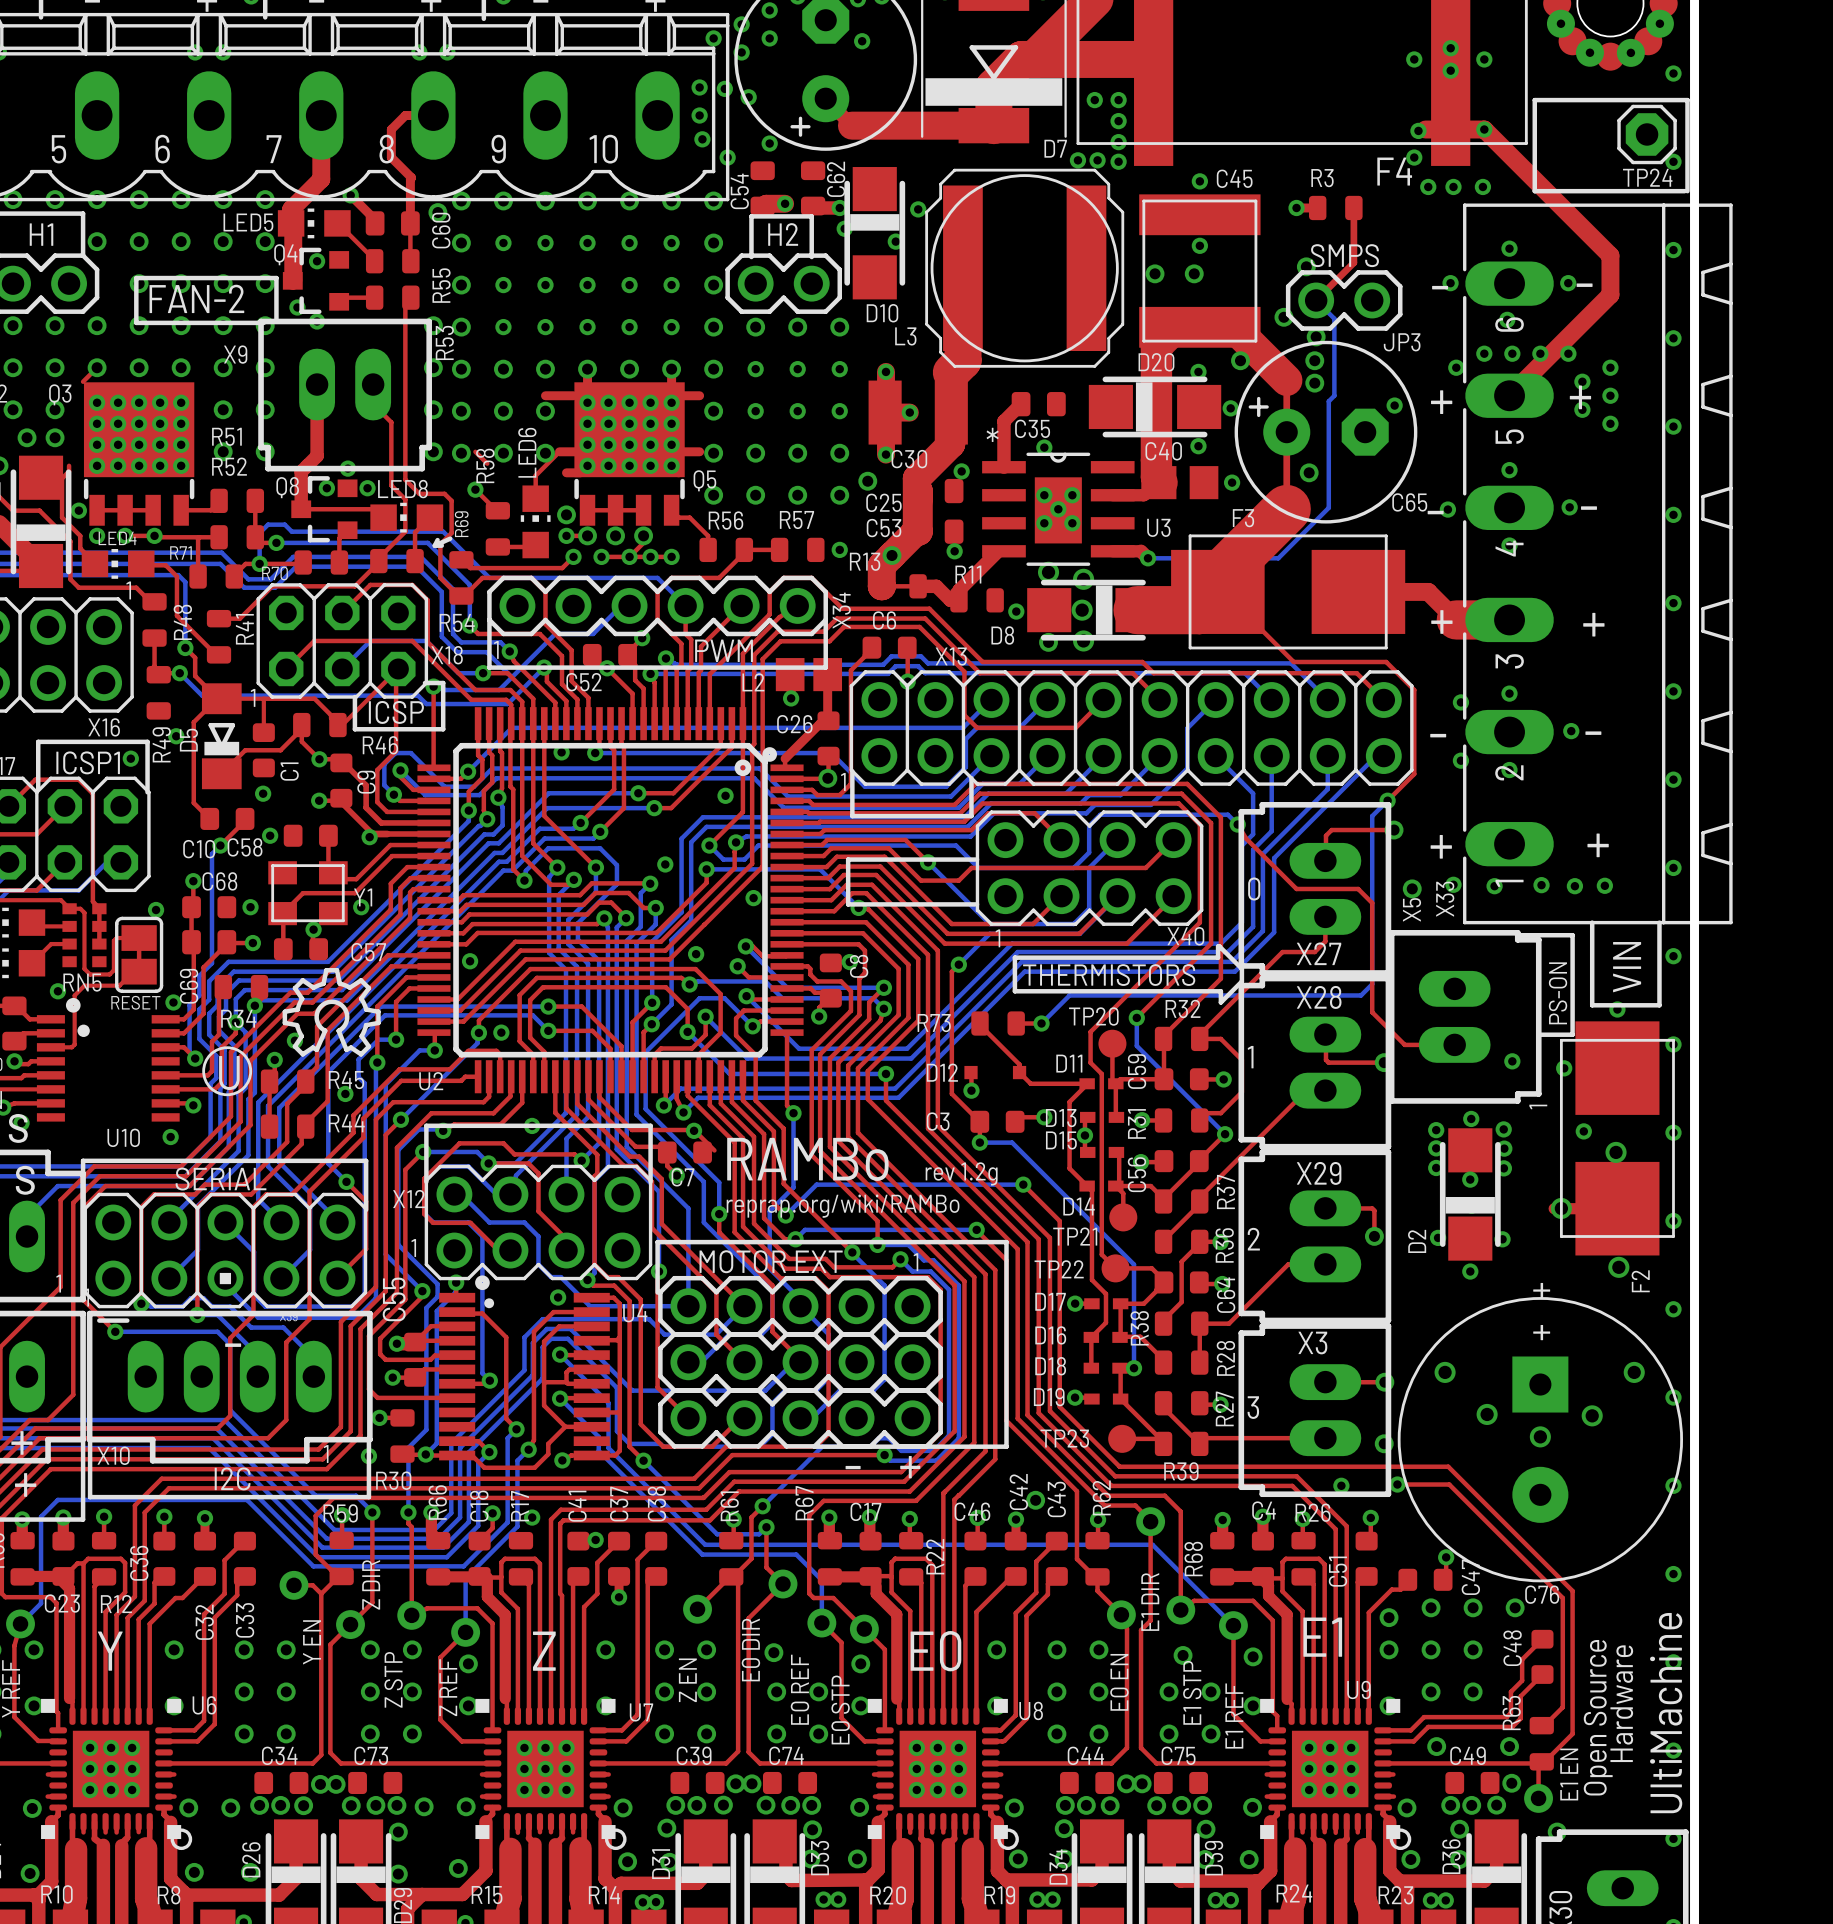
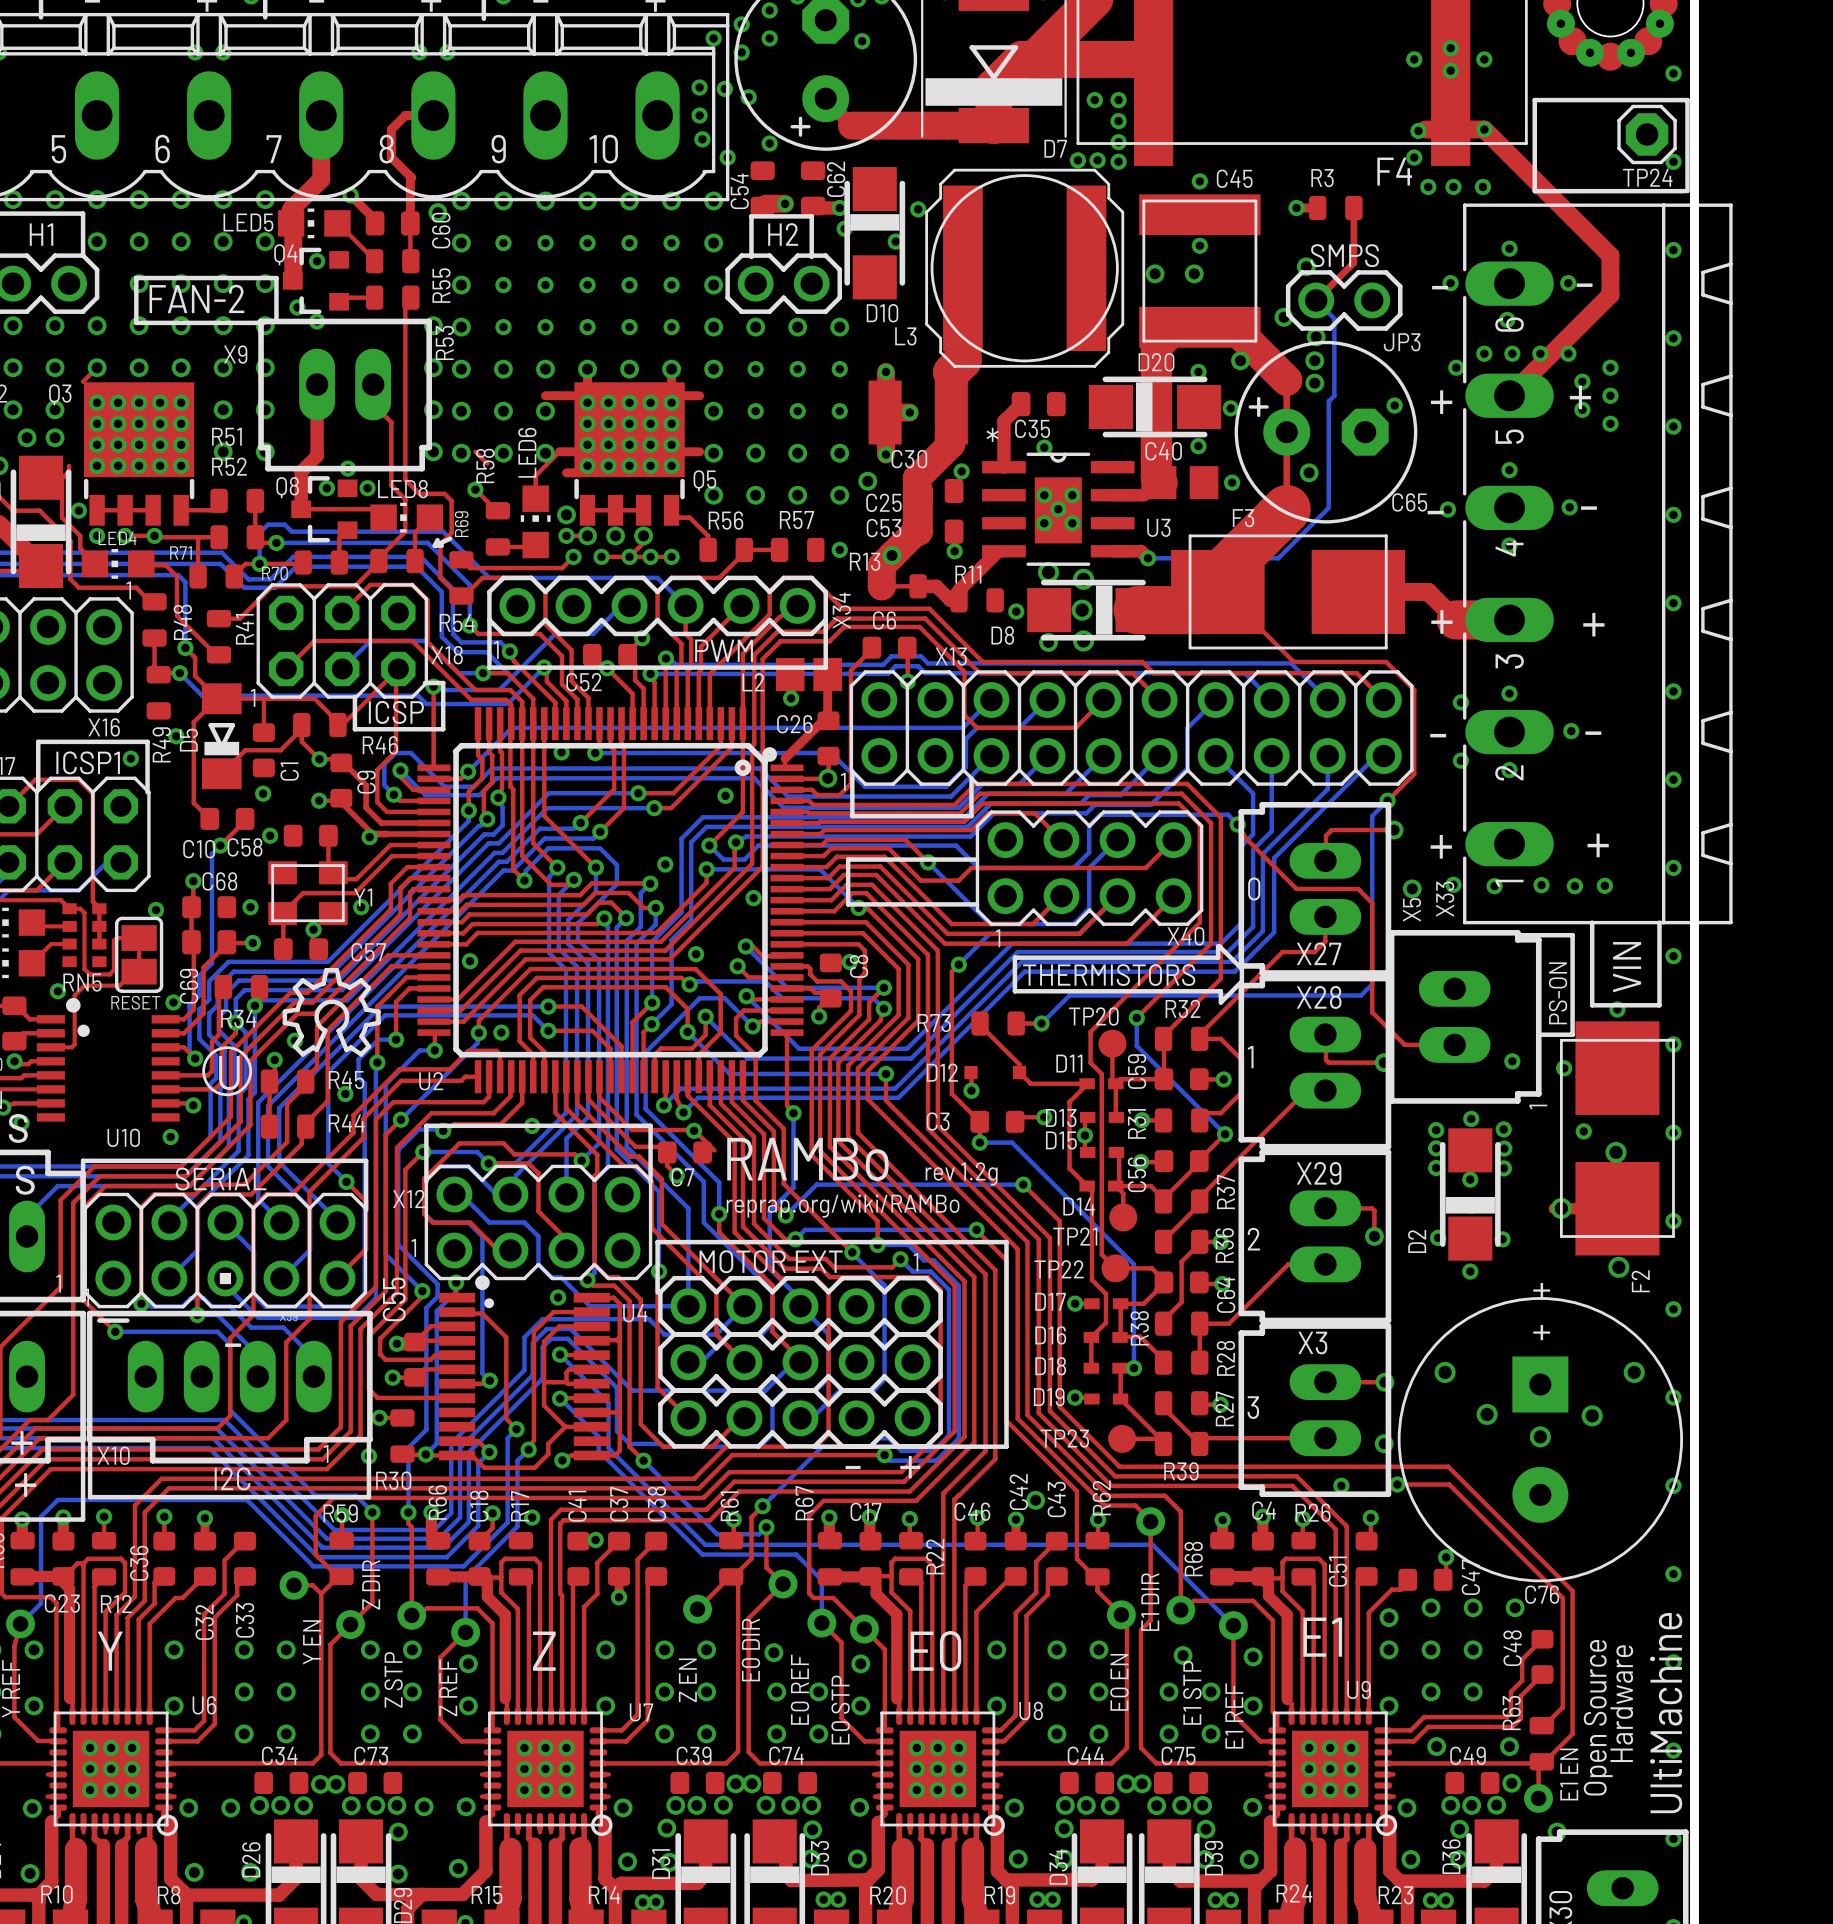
U6 footprint: [41, 1698, 193, 1851] -> [49, 1707, 179, 1837]
U7 footprint: [475, 1698, 627, 1851] -> [483, 1707, 613, 1837]
U8 footprint: [867, 1698, 1019, 1851] -> [876, 1707, 1005, 1837]
U9 footprint: [1260, 1698, 1412, 1851] -> [1268, 1707, 1398, 1837]

